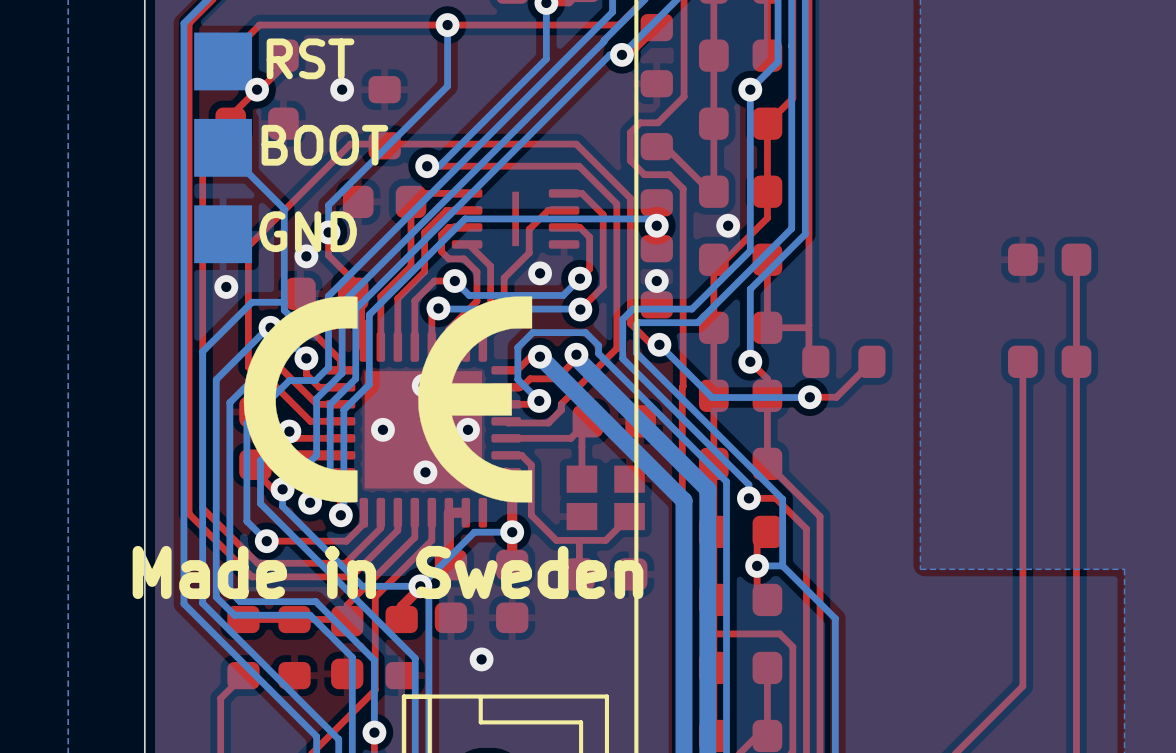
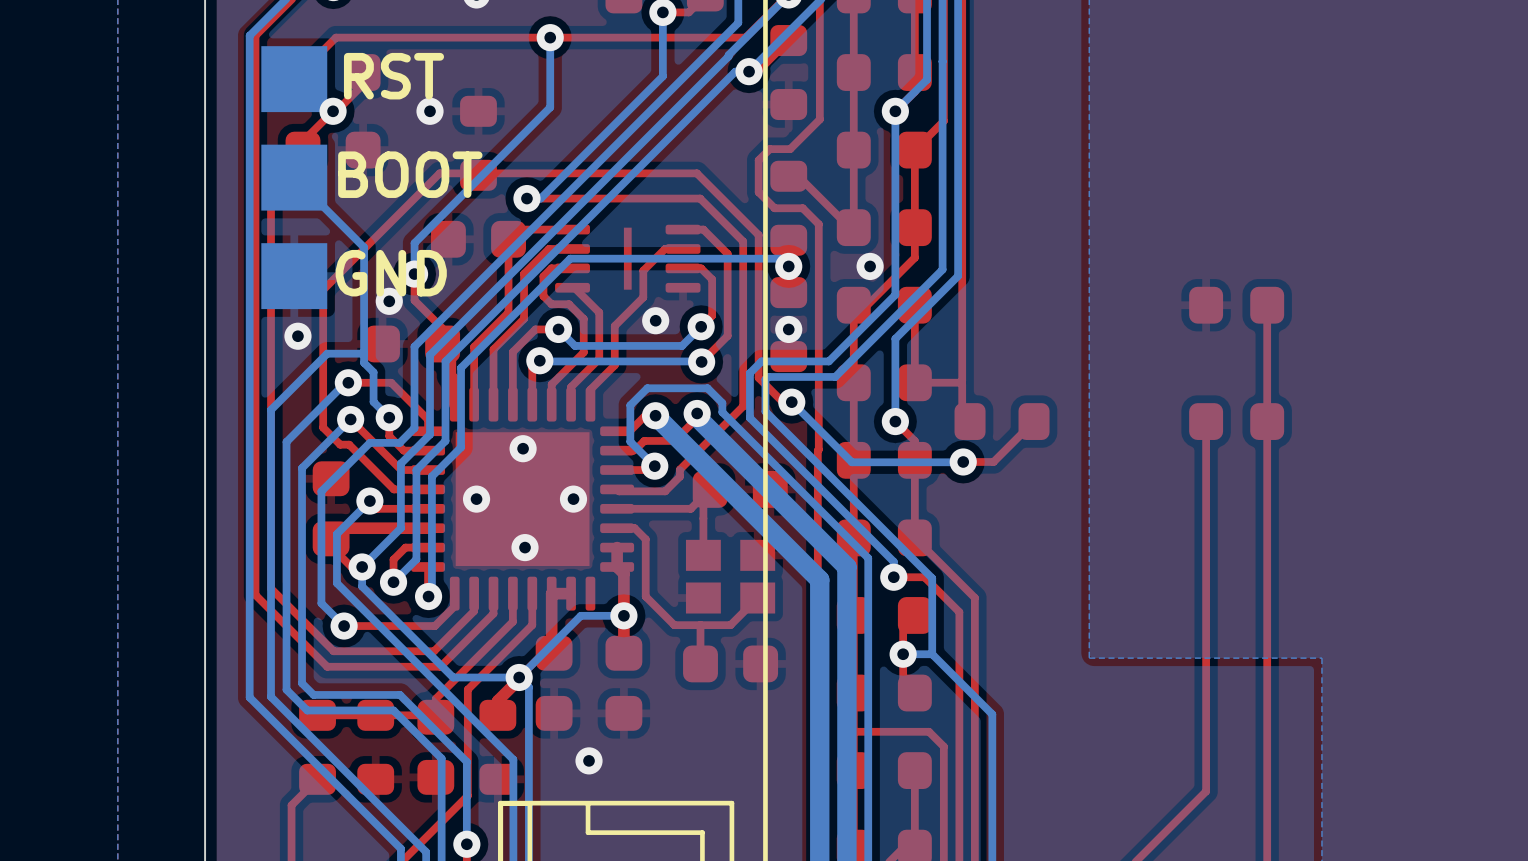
drawing: [243, 296, 533, 503] -> none
text: Made in Sweden (388, 572) -> none

